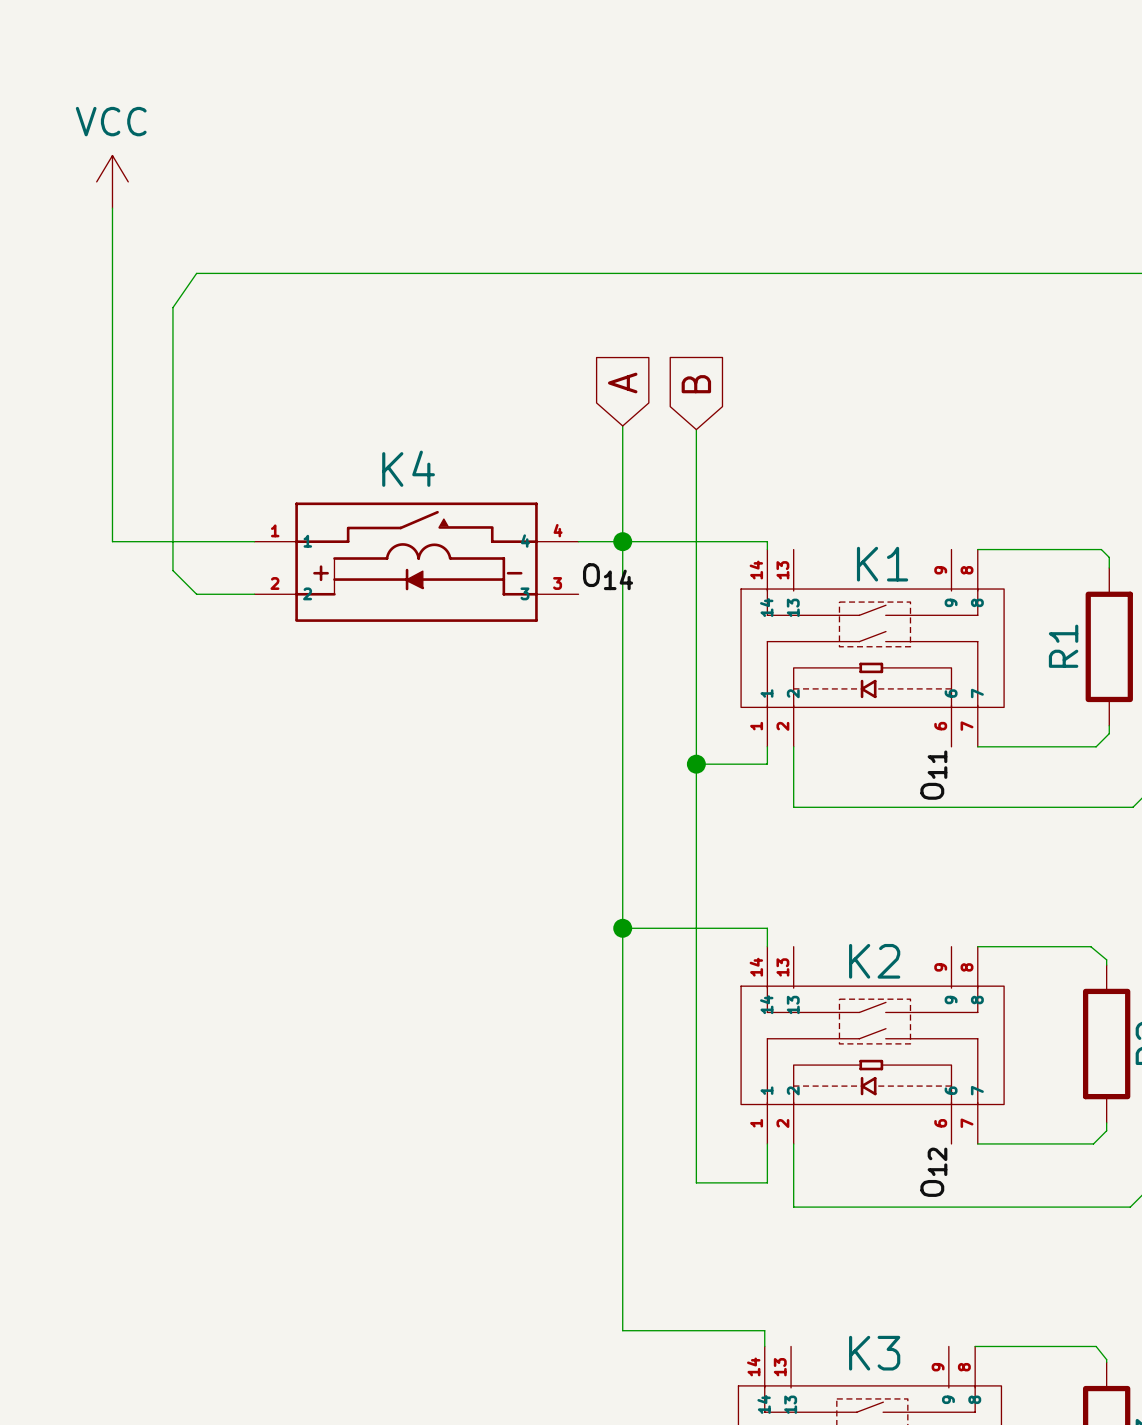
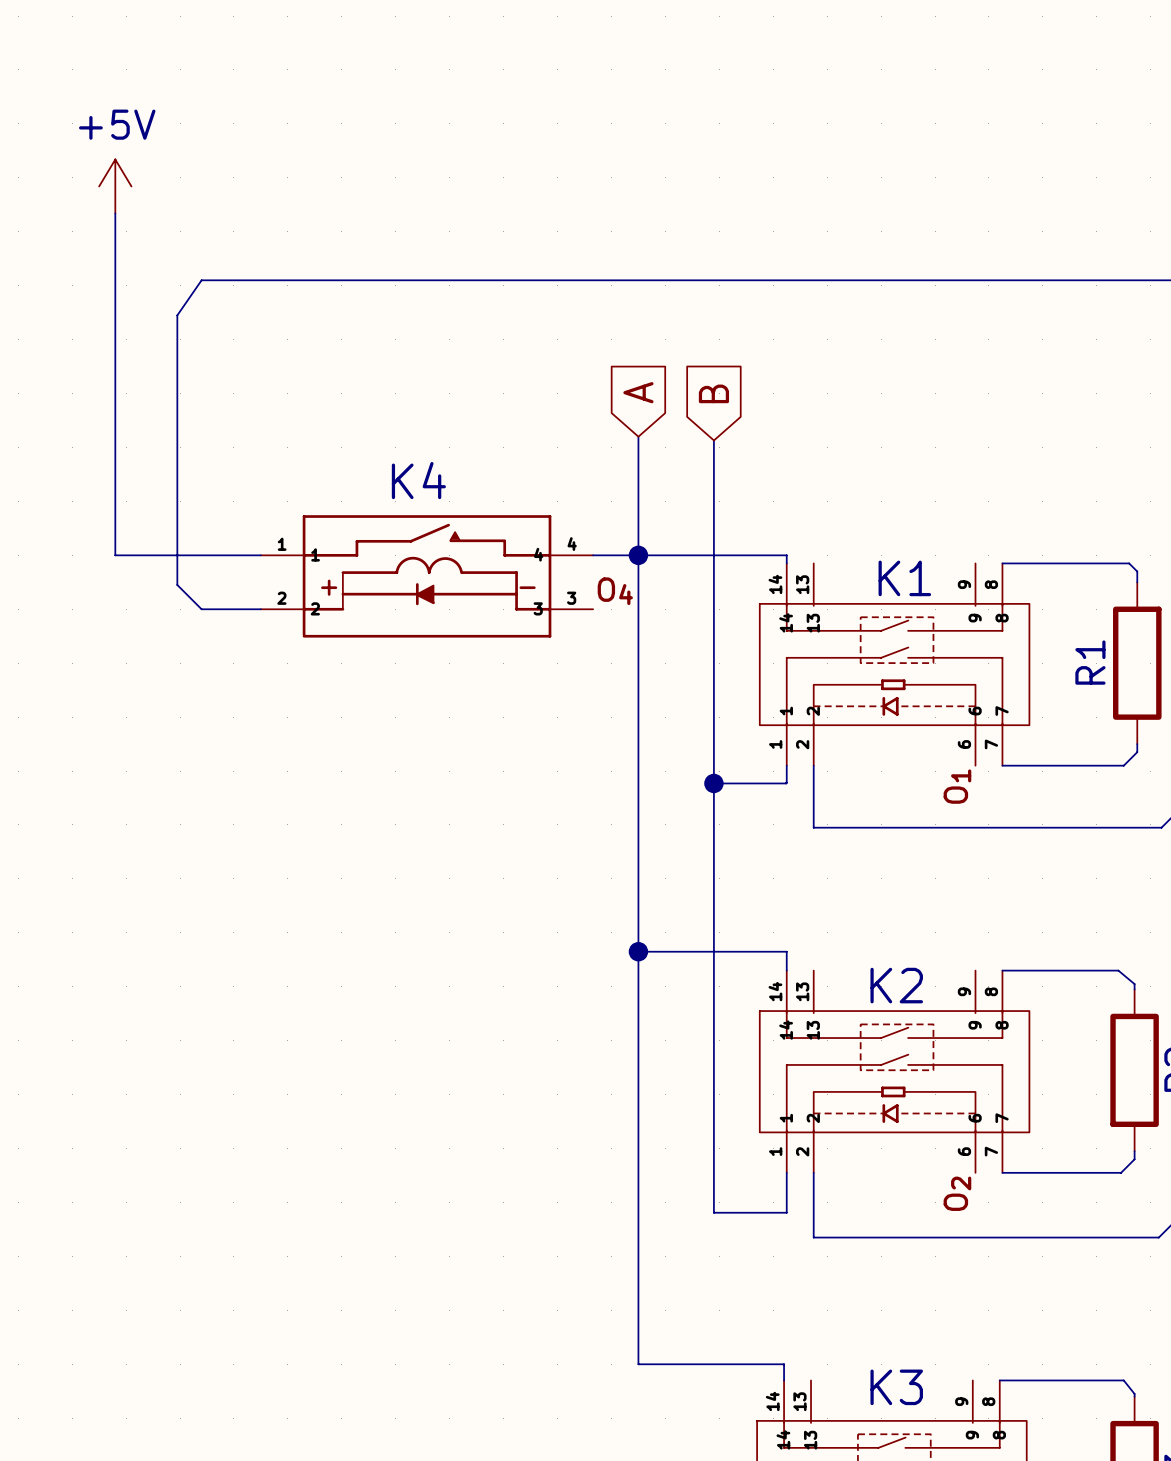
power symbol: VCC (112, 181) -> +5V (115, 186)
label: O14 (608, 576) -> O4 (615, 591)
label: O11 (933, 775) -> O1 (957, 786)
label: O12 (933, 1172) -> O2 (957, 1193)

